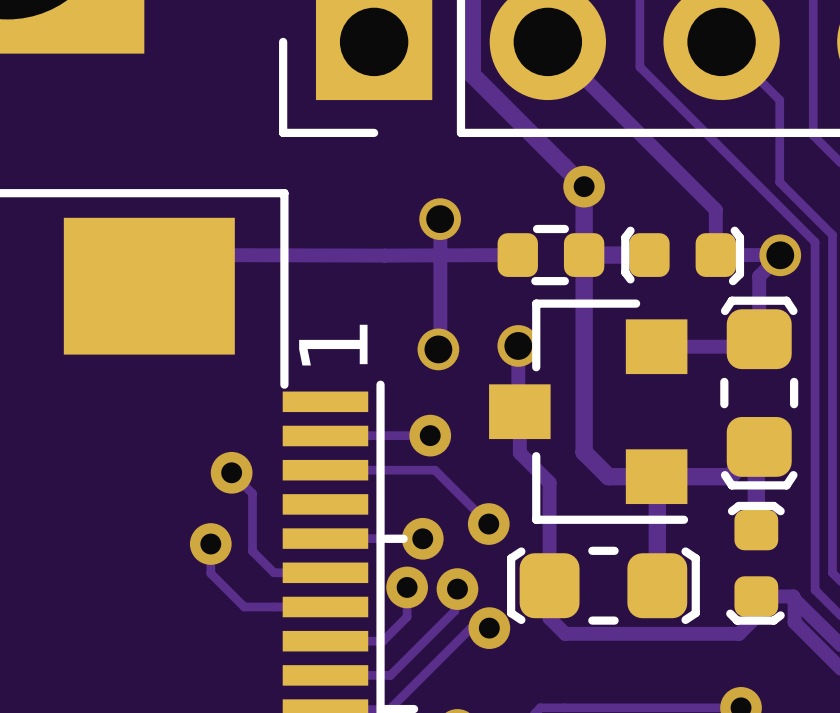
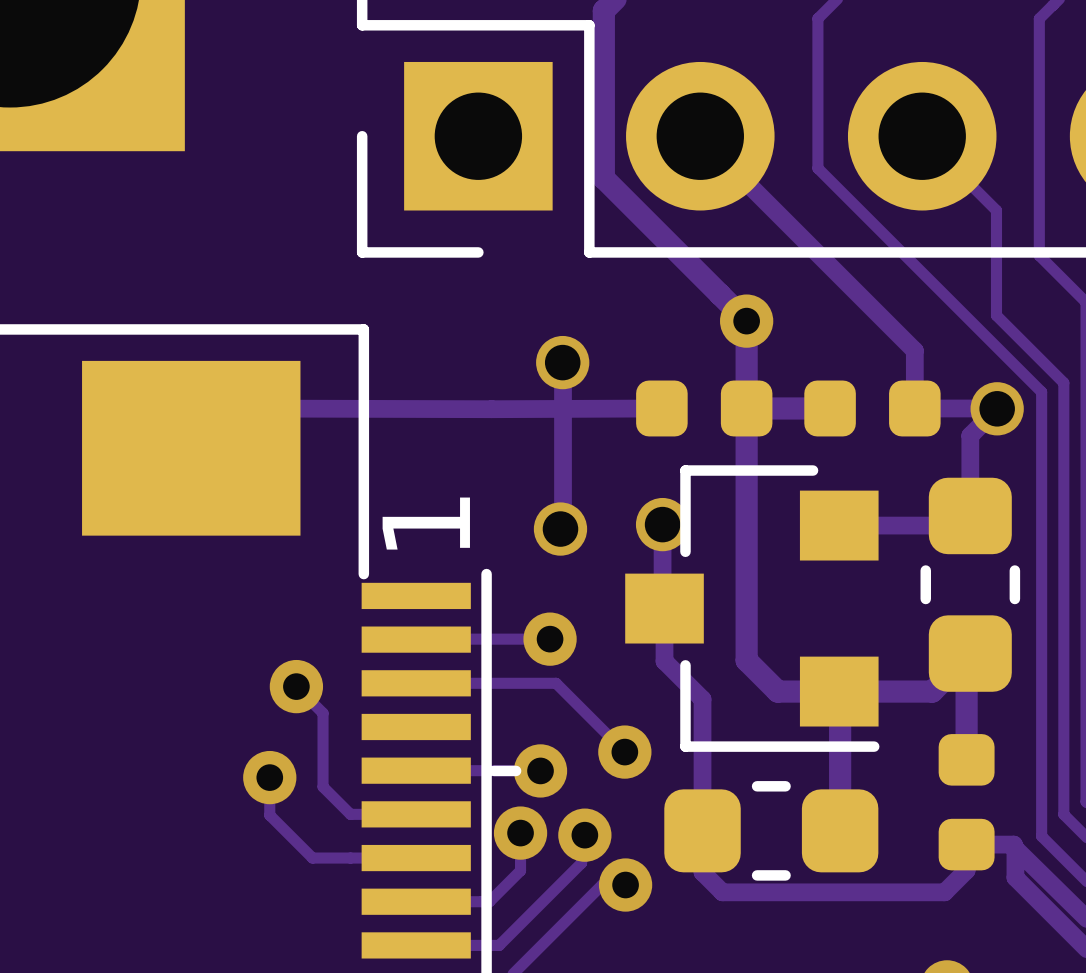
part footprint: [497, 224, 605, 286] -> [636, 380, 773, 437]
part footprint: [621, 226, 745, 286] -> [804, 380, 941, 437]
part footprint: [720, 296, 799, 490] -> [920, 477, 1021, 692]
part footprint: [726, 501, 785, 625] -> [938, 734, 995, 871]
part footprint: [507, 546, 700, 625] -> [664, 781, 879, 881]

